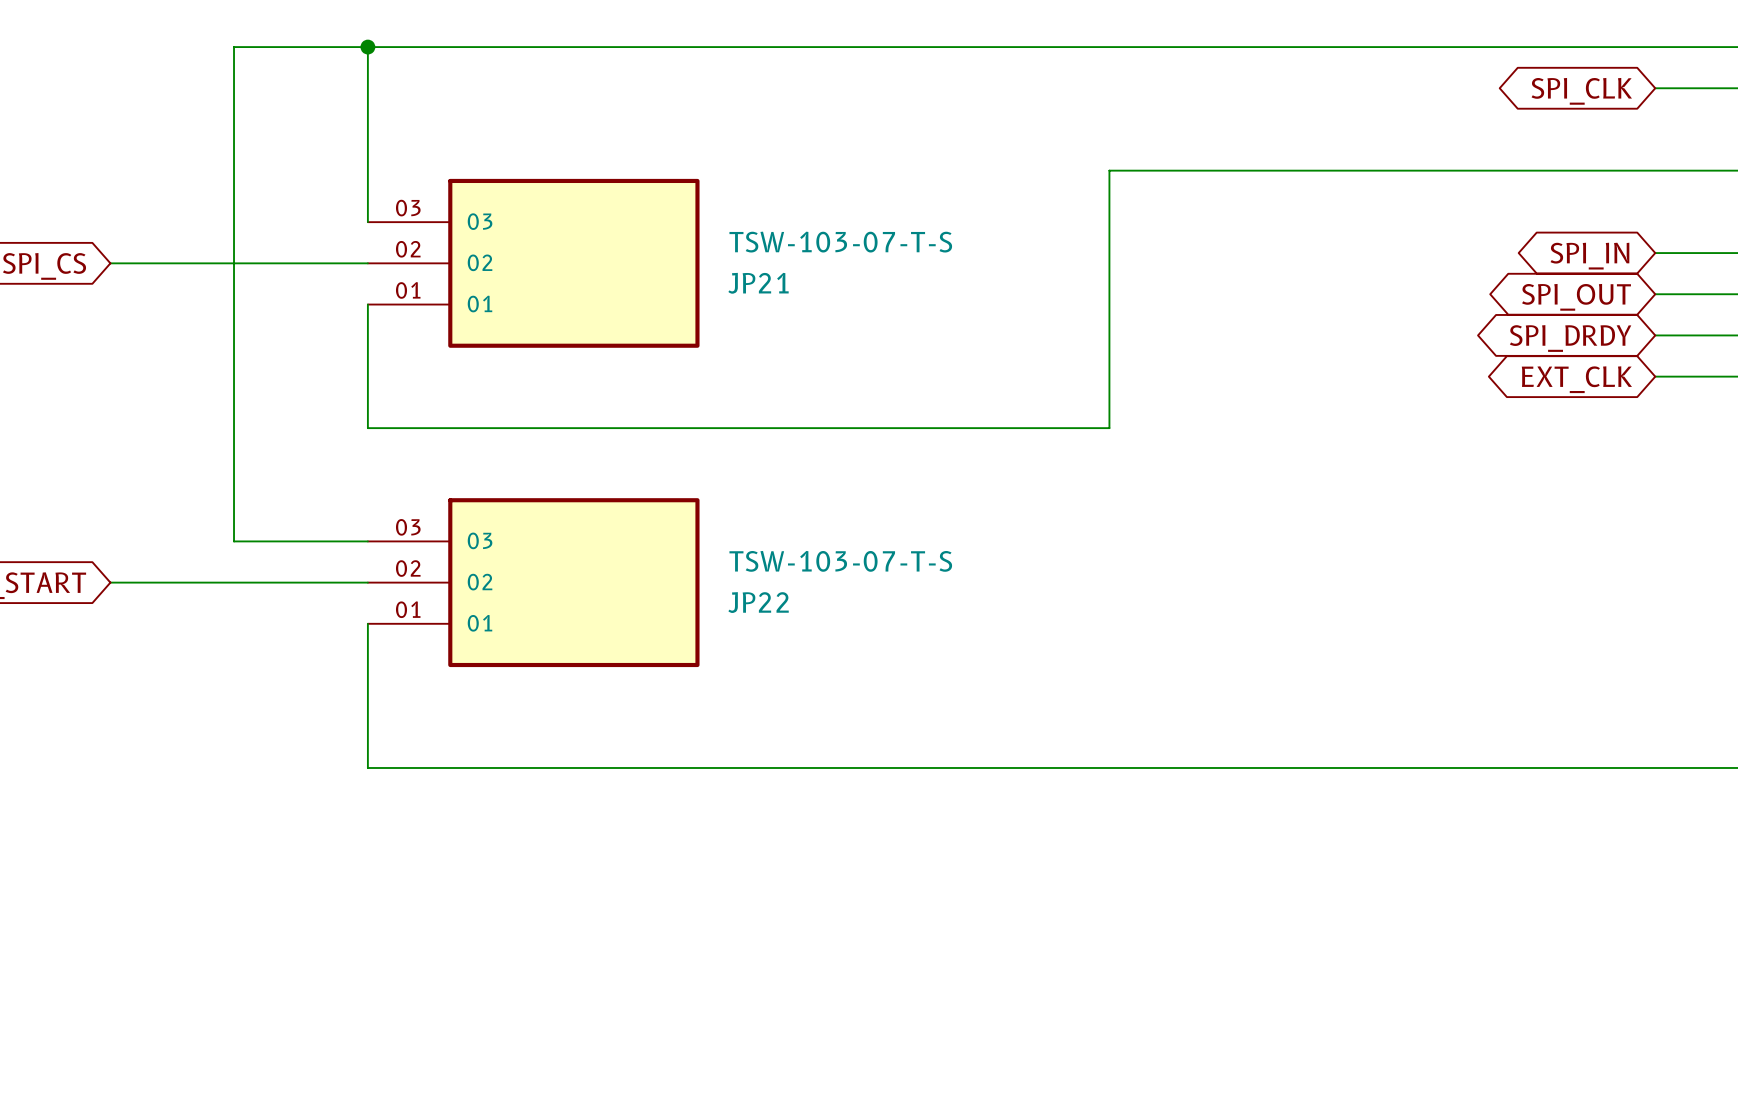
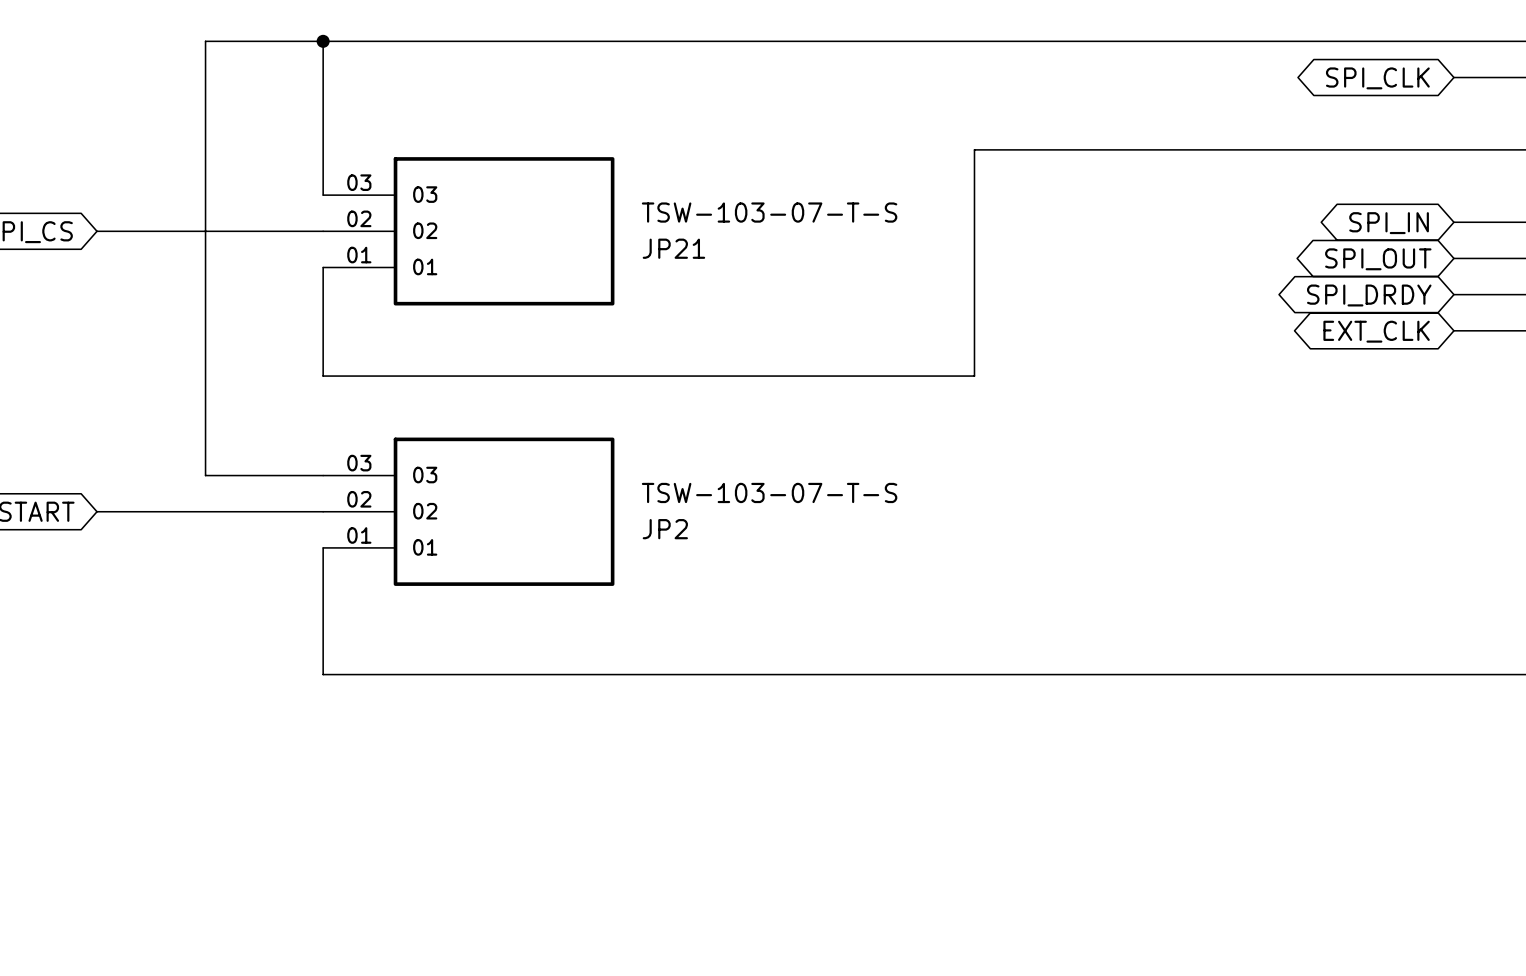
JP22 name: JP22 (758, 602) -> JP2 (665, 529)

